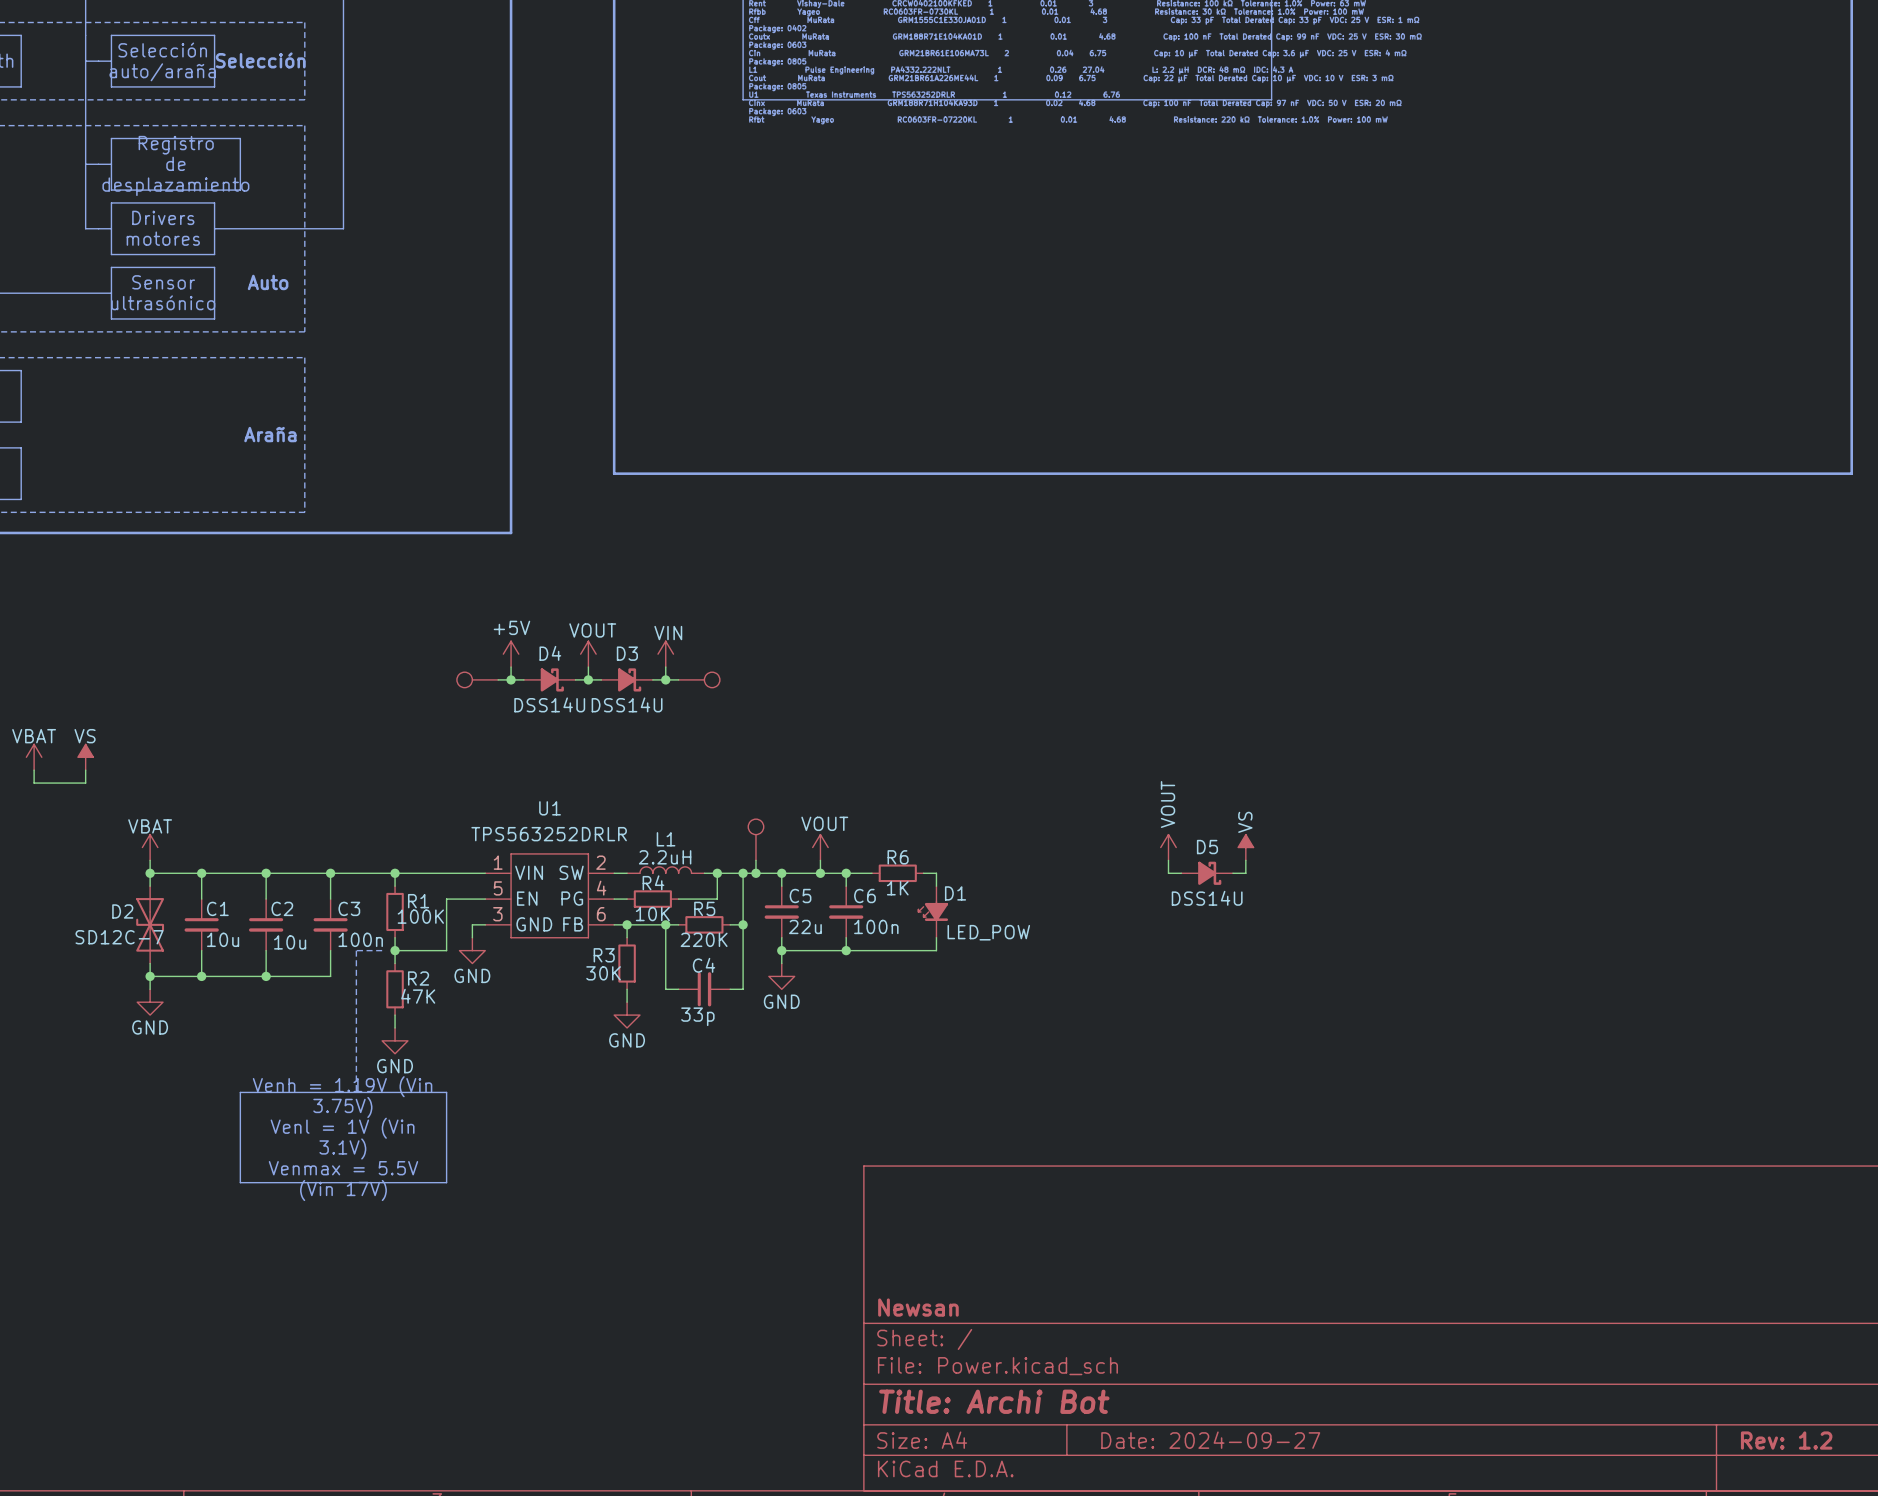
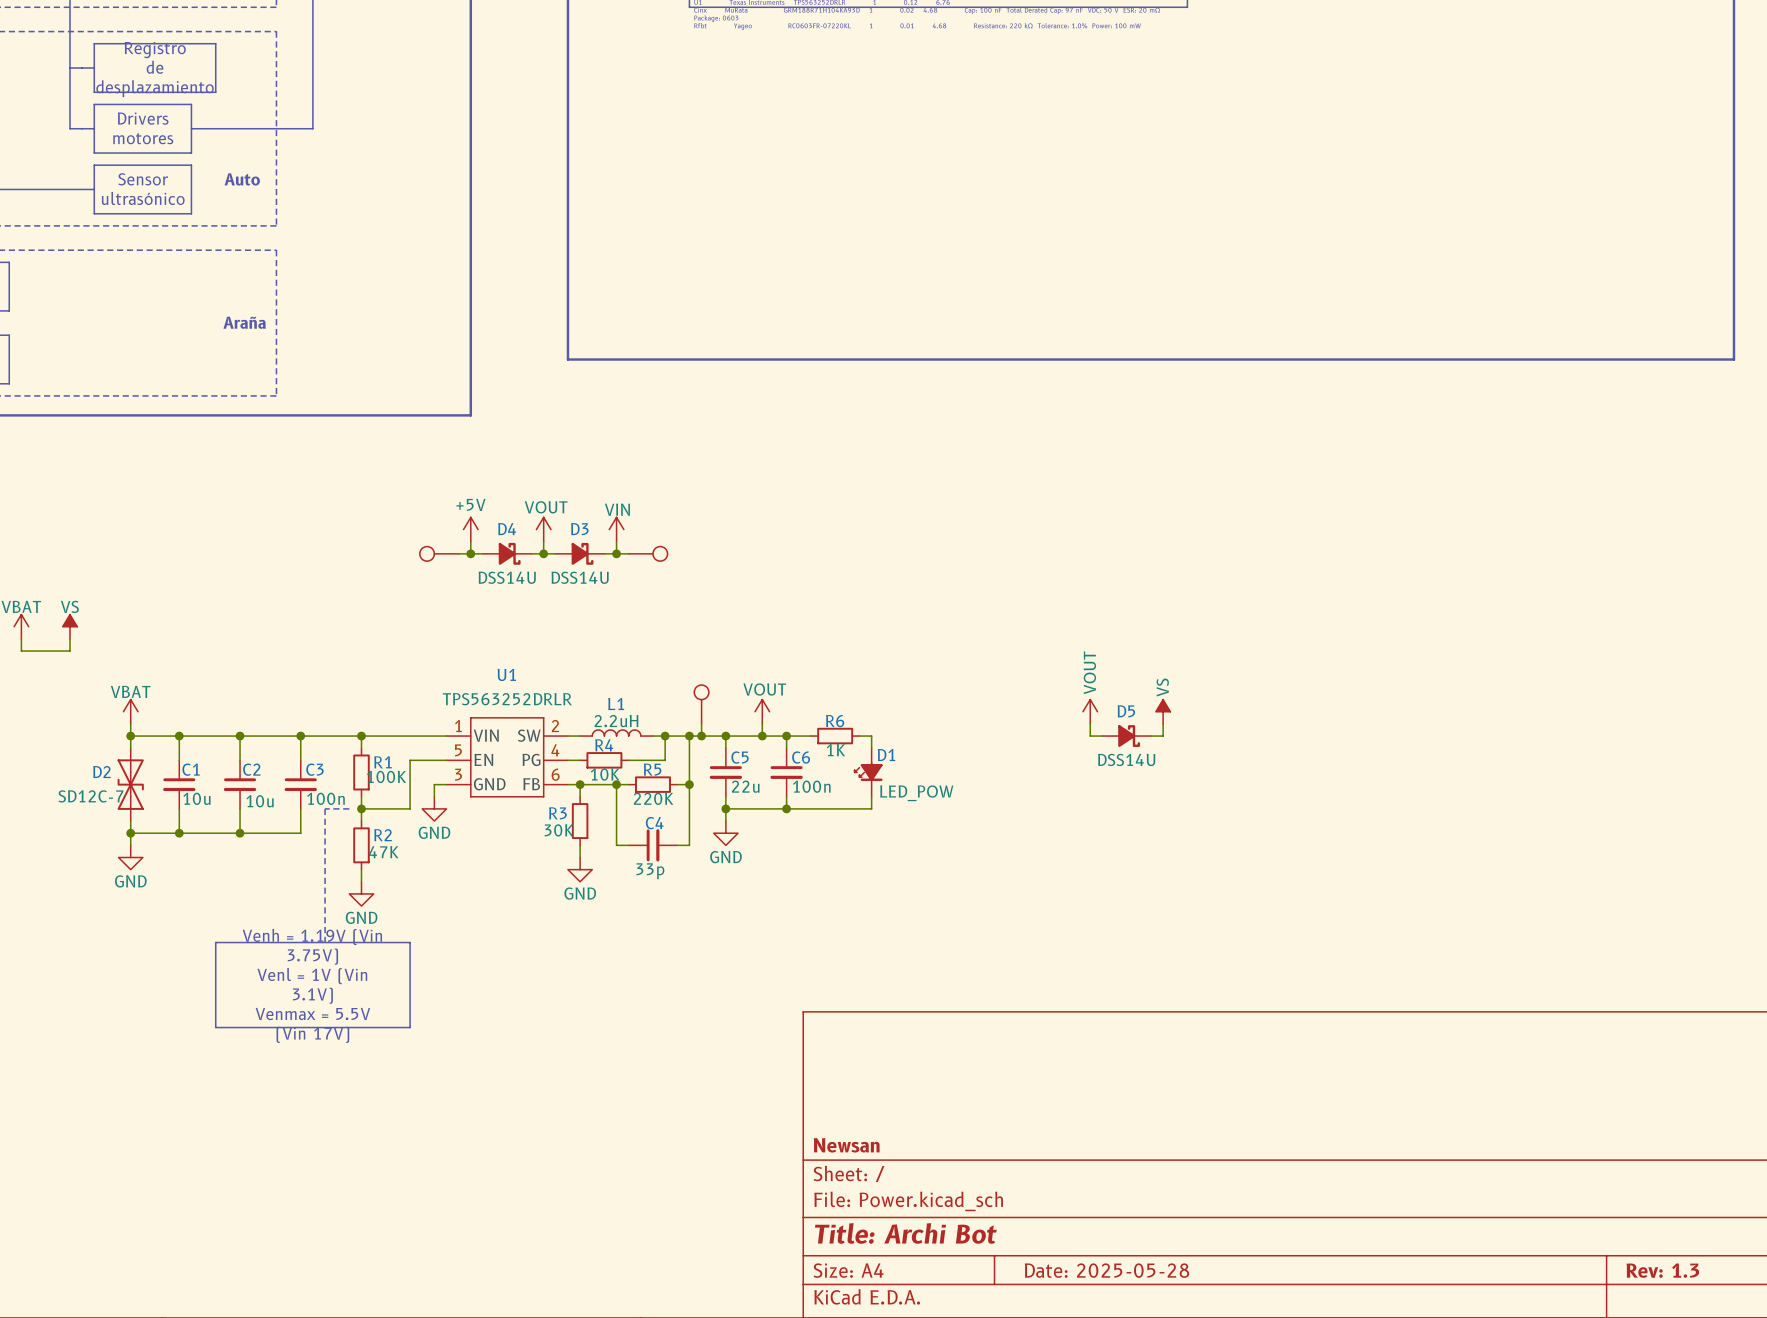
title block: Date: 2024-09-27 (1210, 1440) -> Date: 2025-05-28 (1106, 1270)
title block: Rev: 1.2 (1786, 1440) -> Rev: 1.3 (1662, 1270)

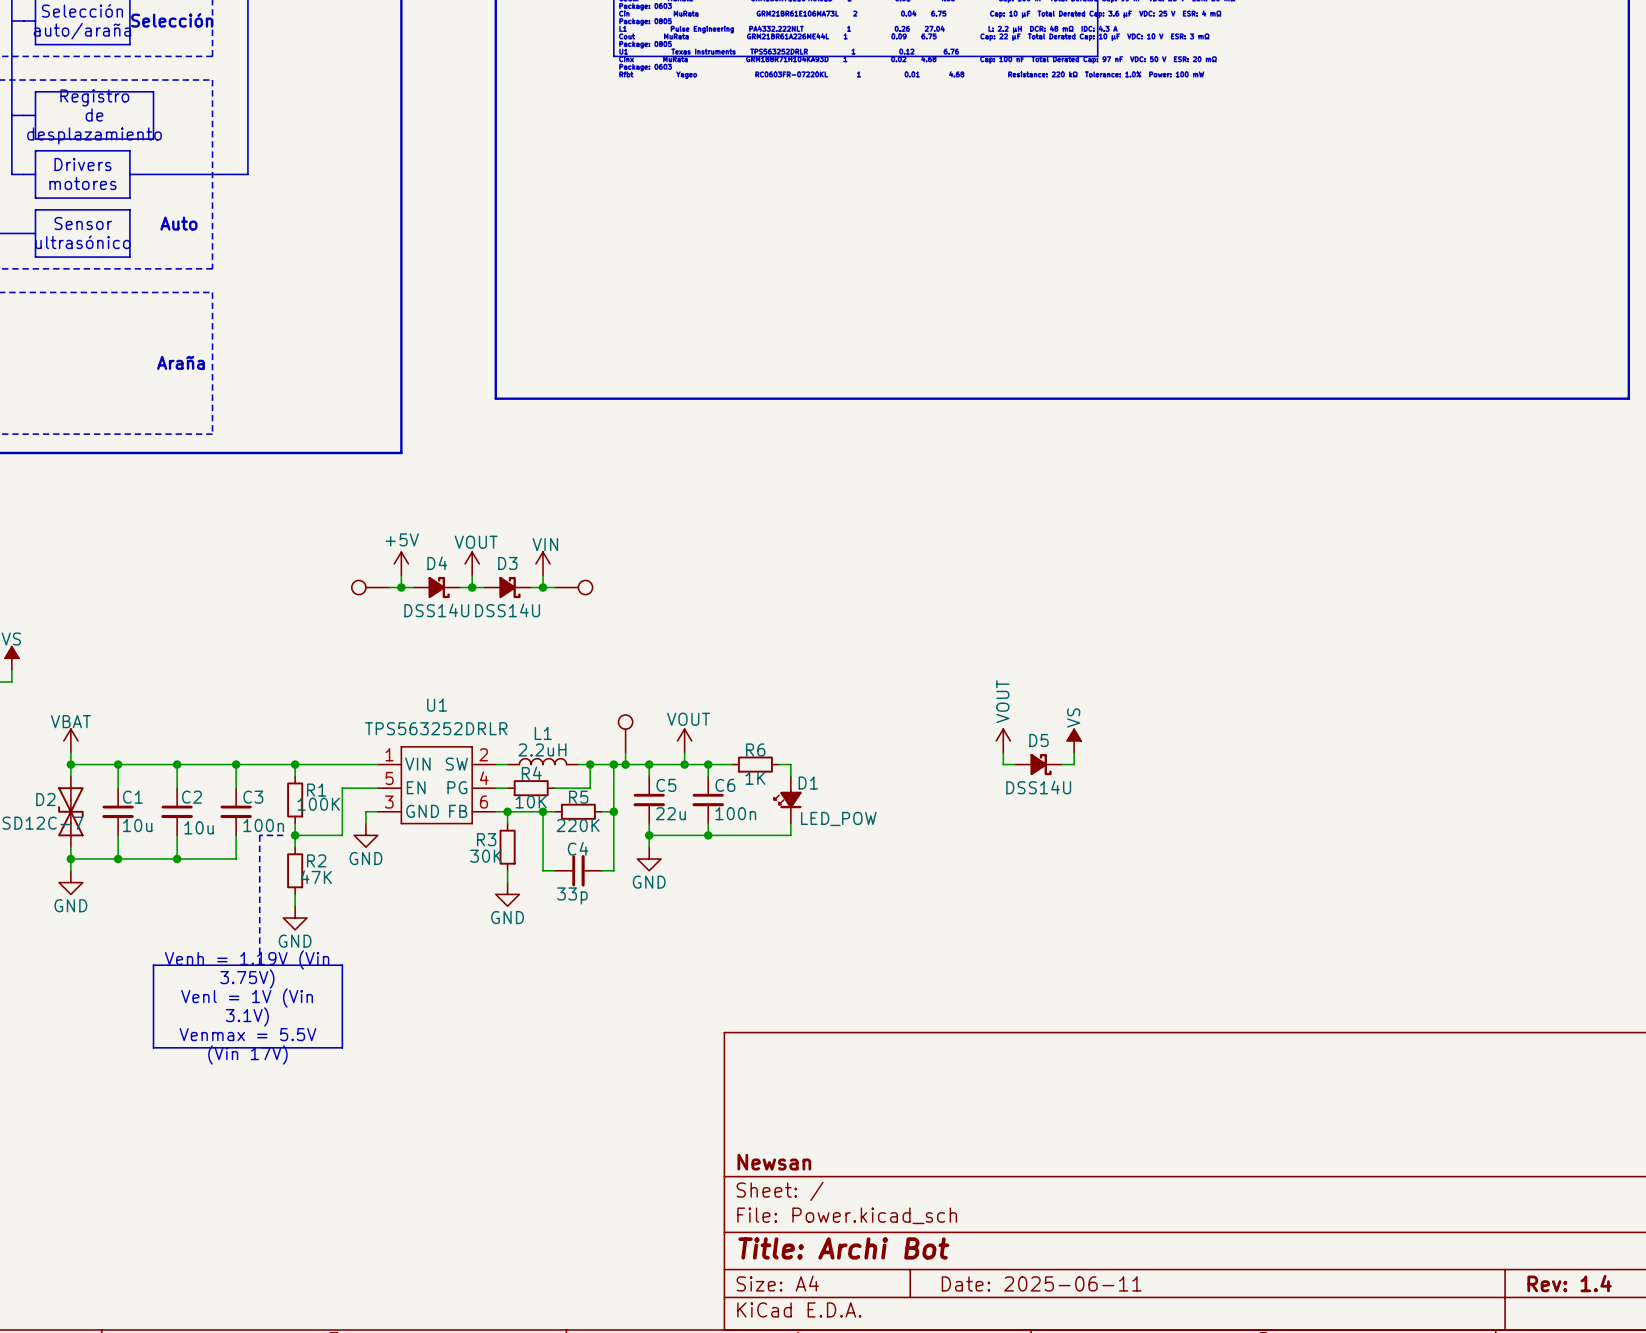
title block: Date: 2025-05-28 (1106, 1270) -> Date: 2025-06-11 (1041, 1283)
title block: Rev: 1.3 (1662, 1270) -> Rev: 1.4 (1569, 1283)

